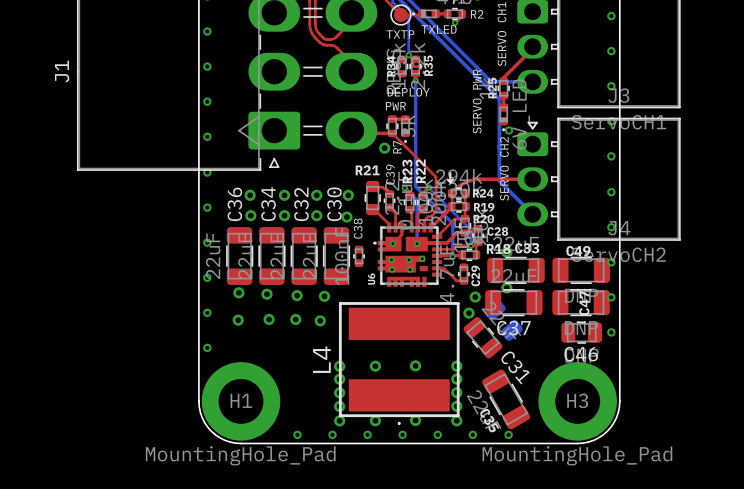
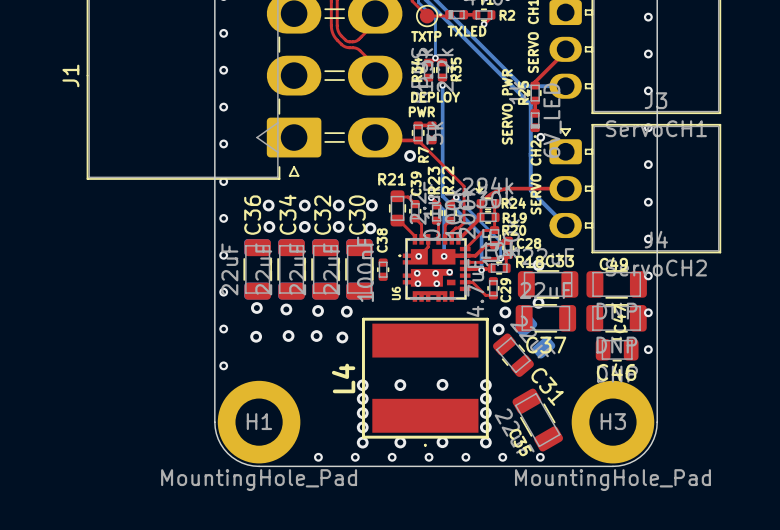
top track: (409, 66) (421, 66) -> none

